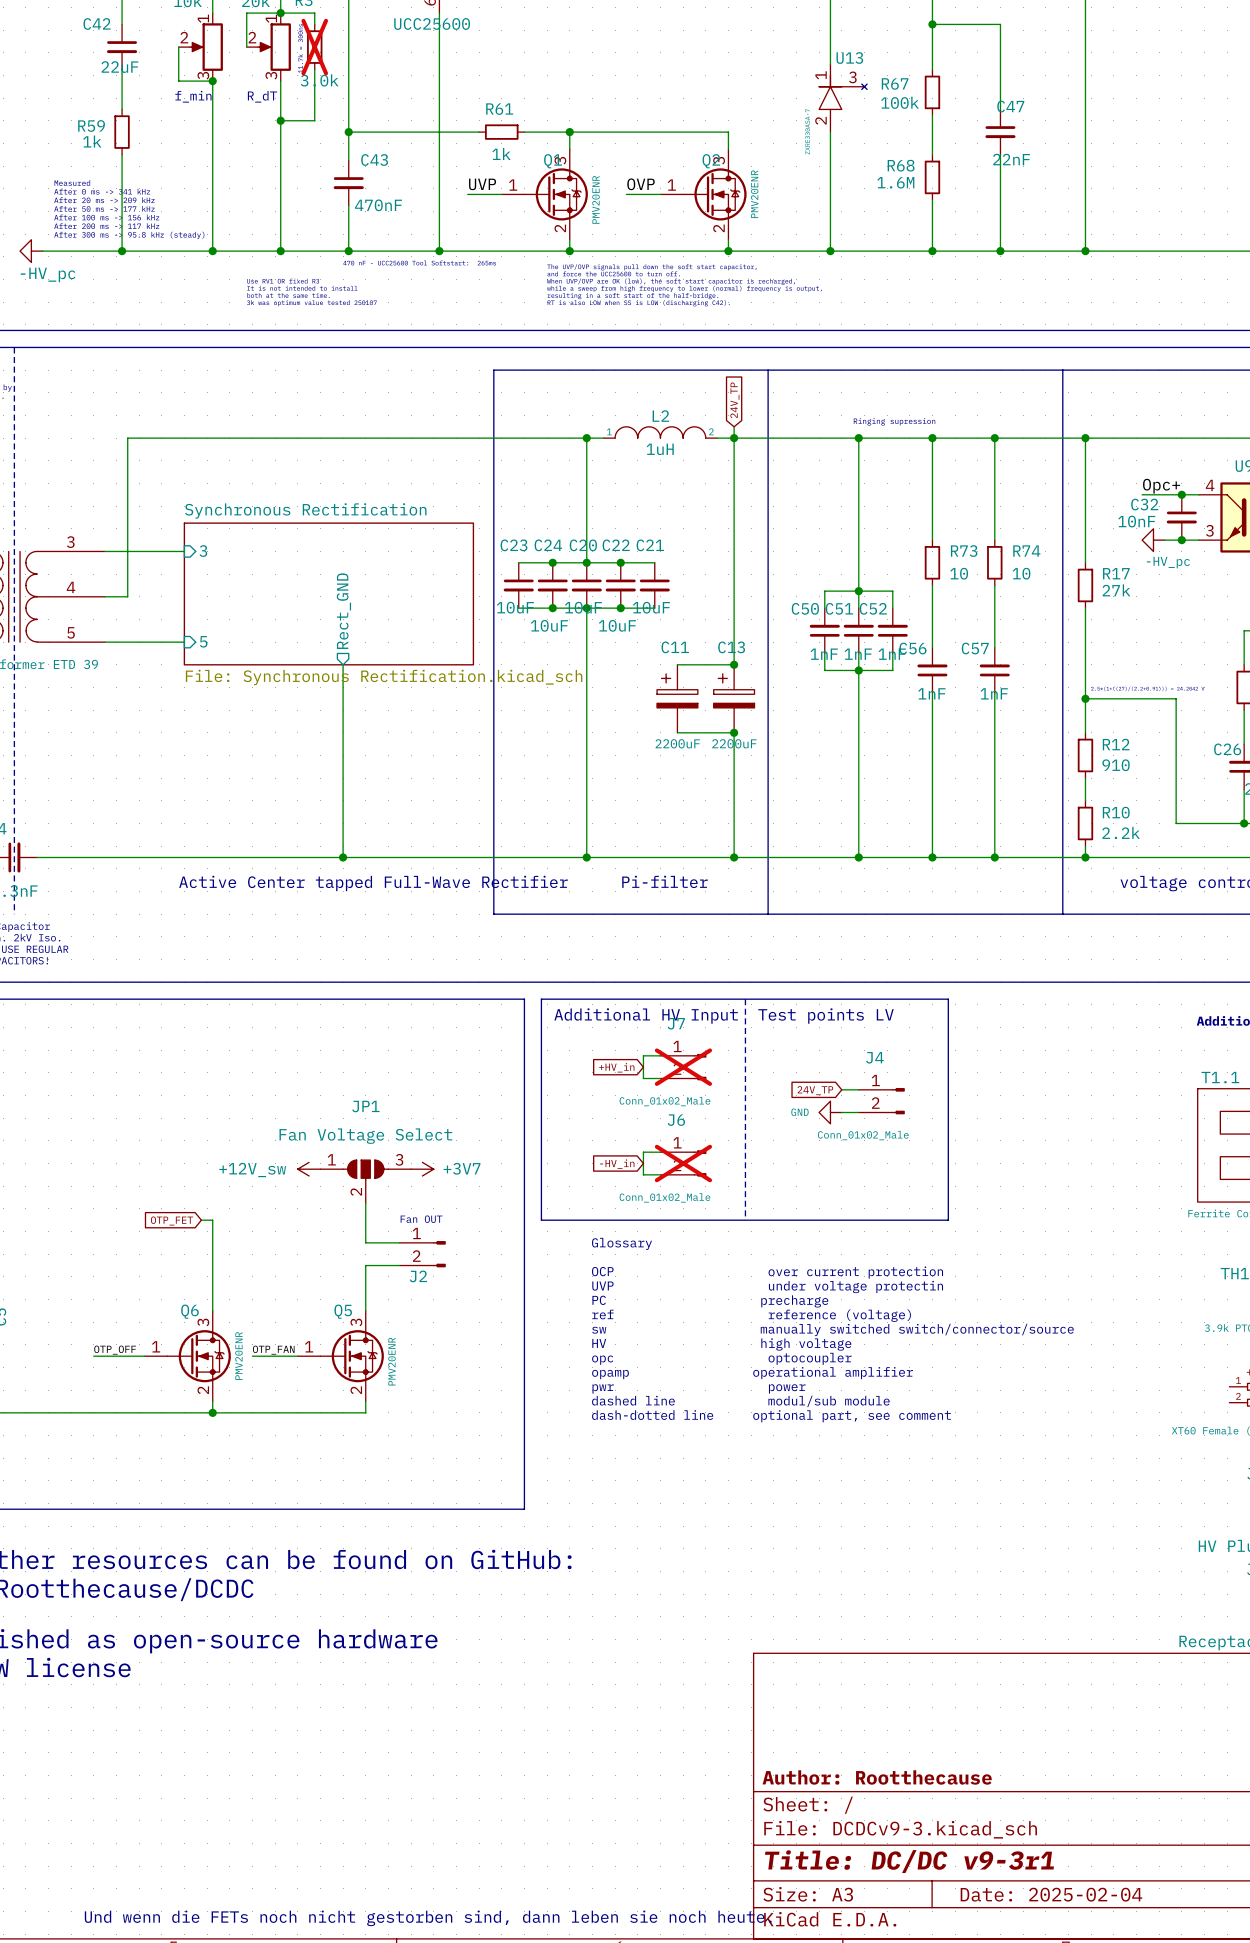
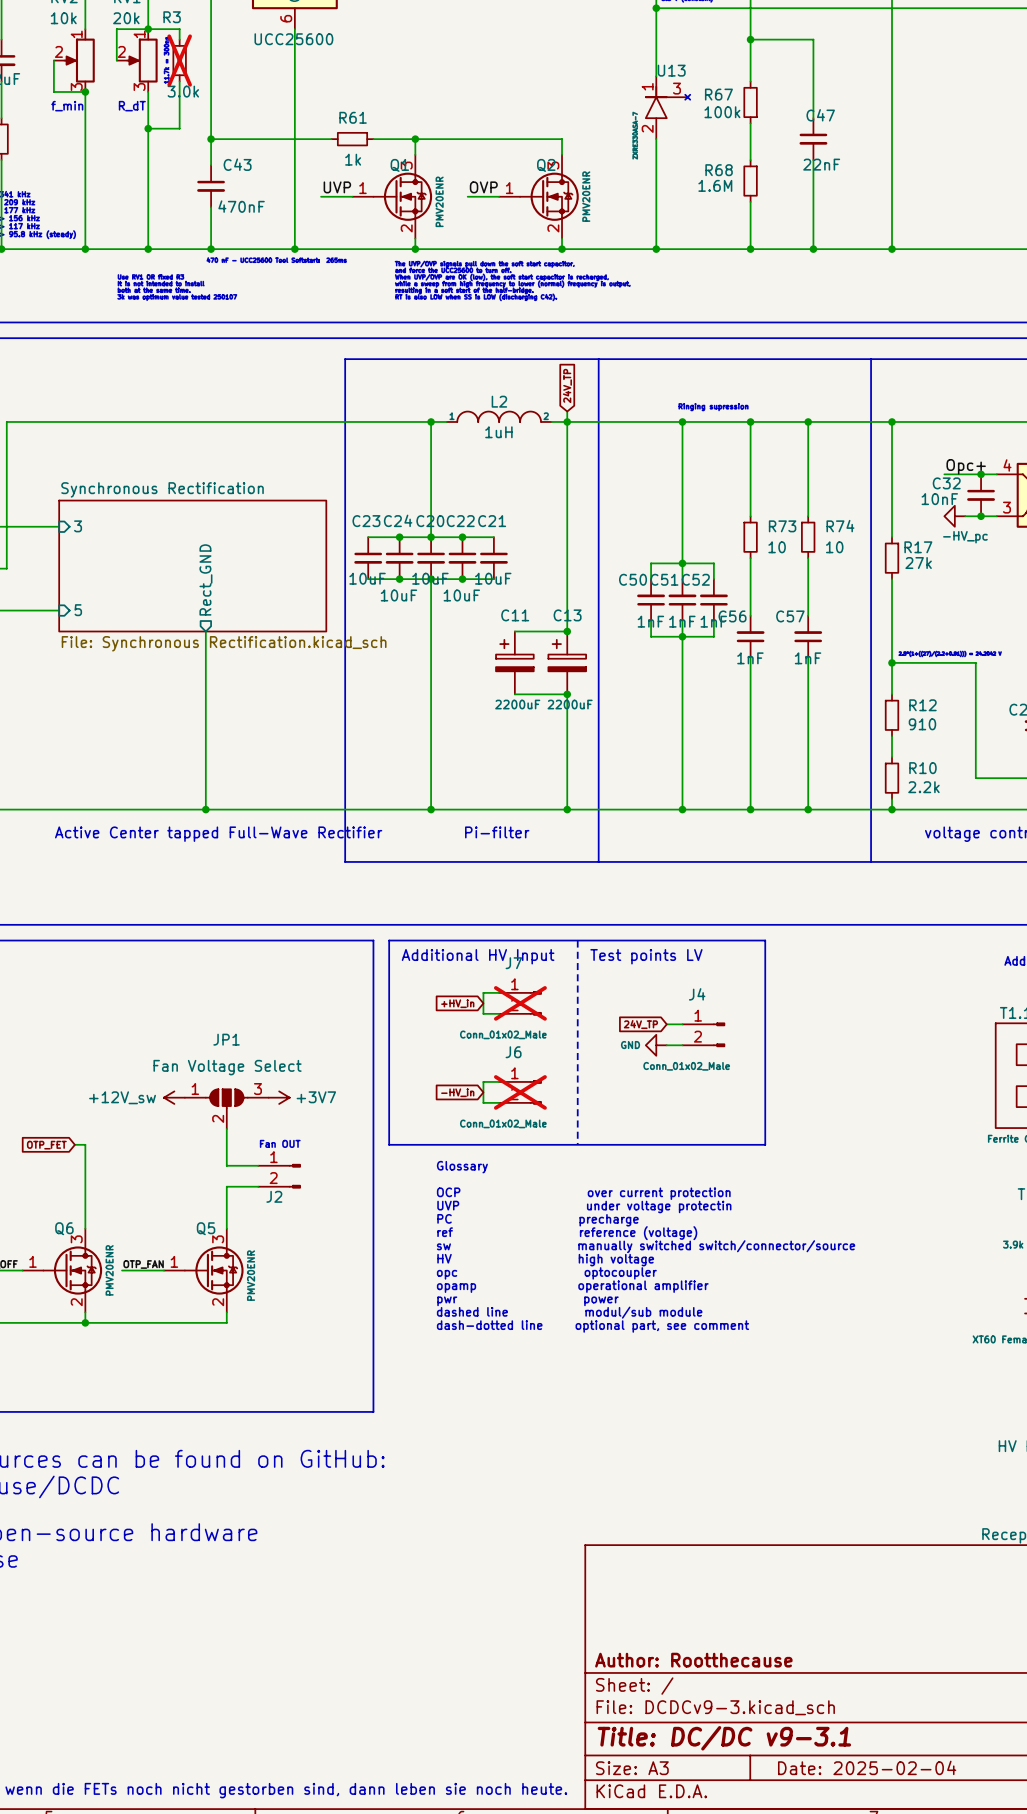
title block: Title: DC/DC v9-3r1 (909, 1861) -> Title: DC/DC v9-3.1 (724, 1738)

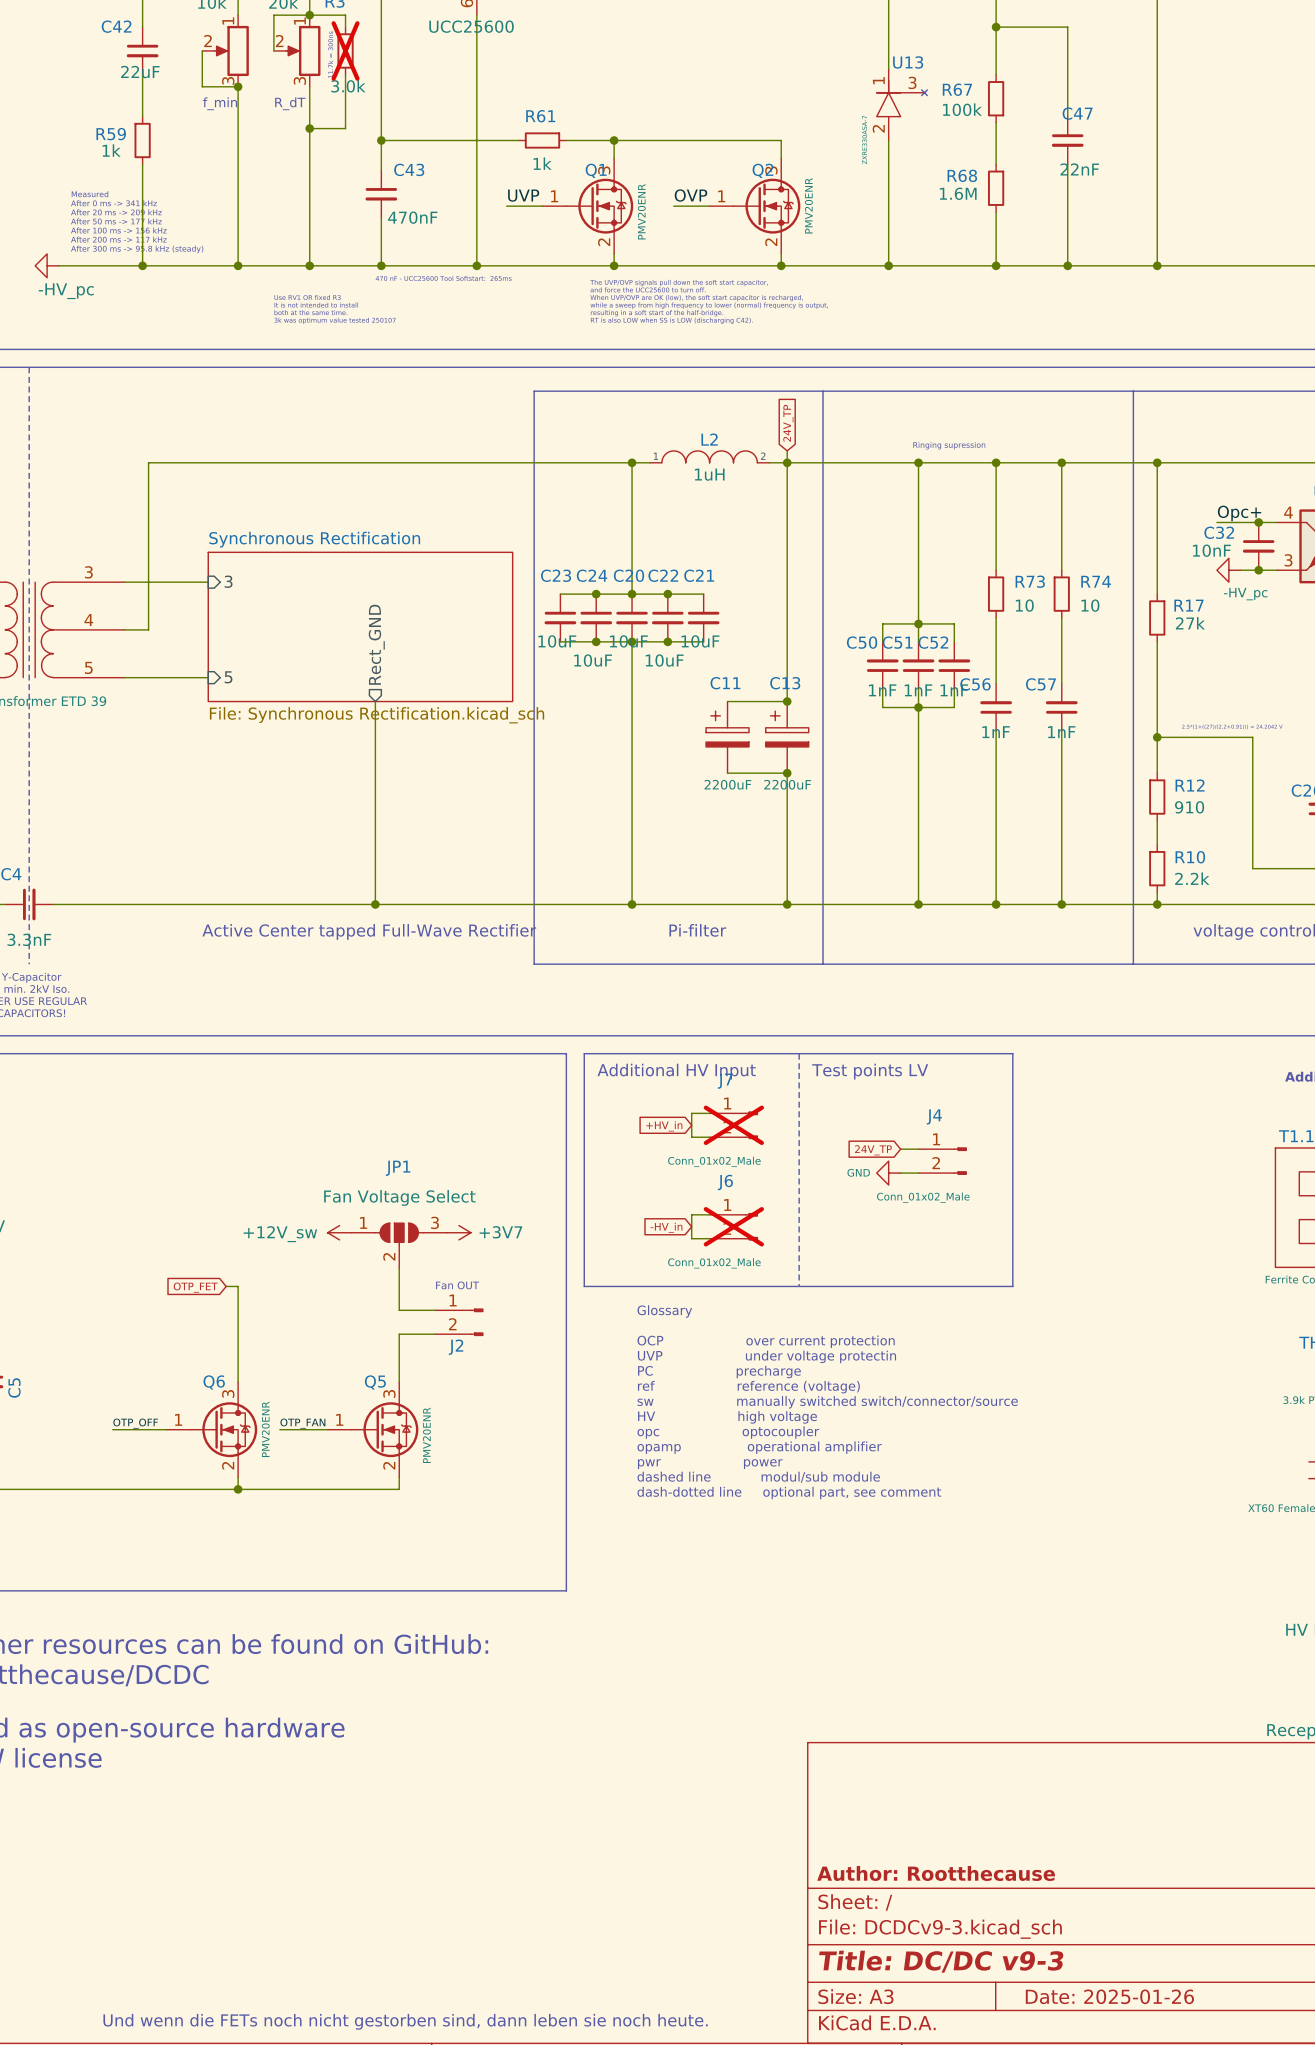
title block: Title: DC/DC v9-3.1 (724, 1738) -> Title: DC/DC v9-3 (941, 1961)
title block: Date: 2025-02-04 (867, 1767) -> Date: 2025-01-26 (1109, 1996)

